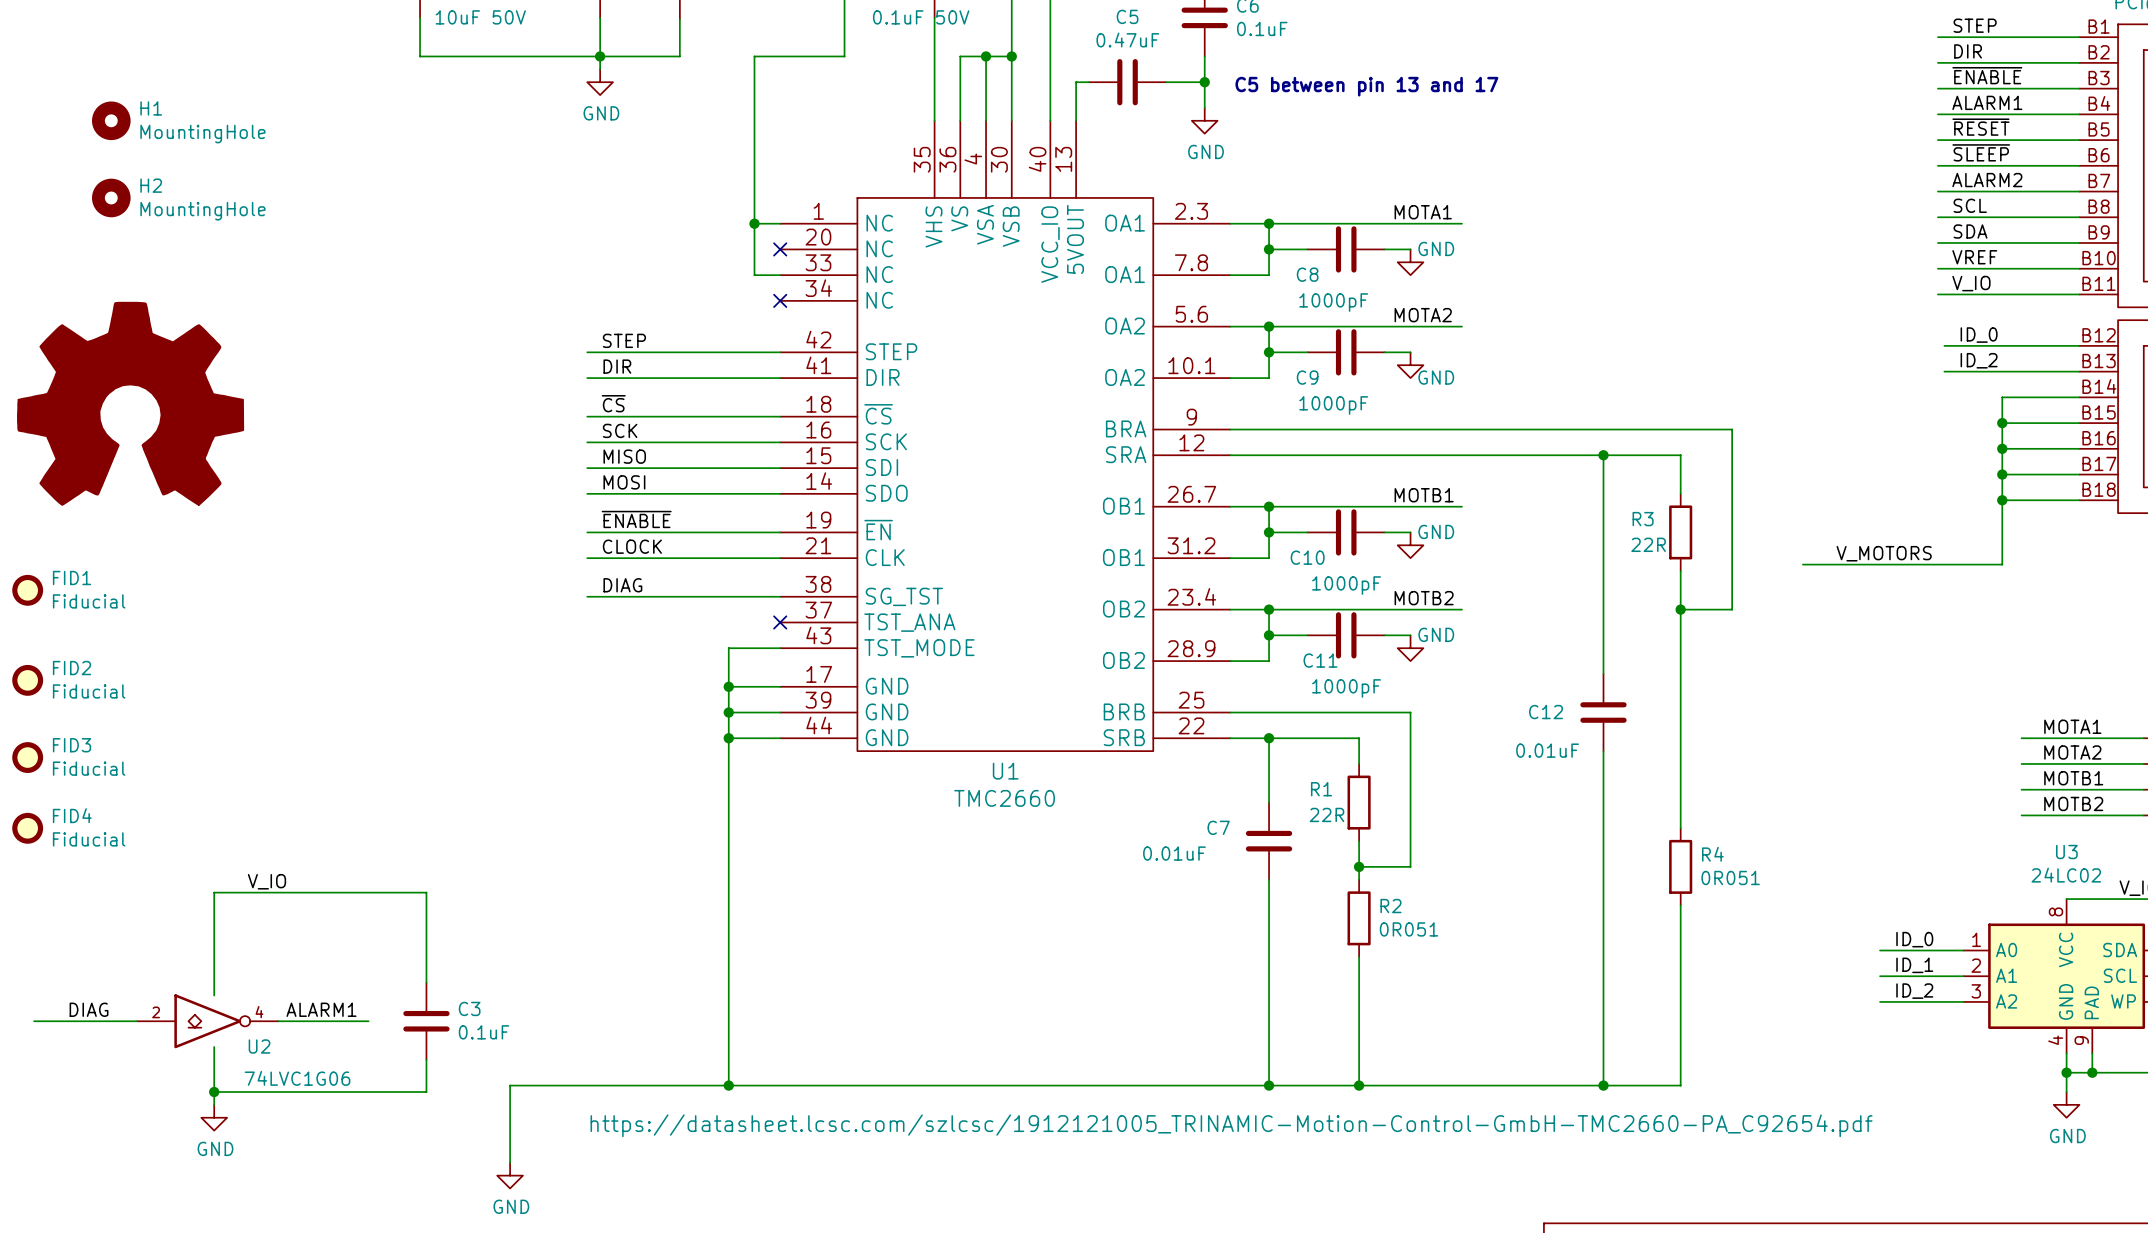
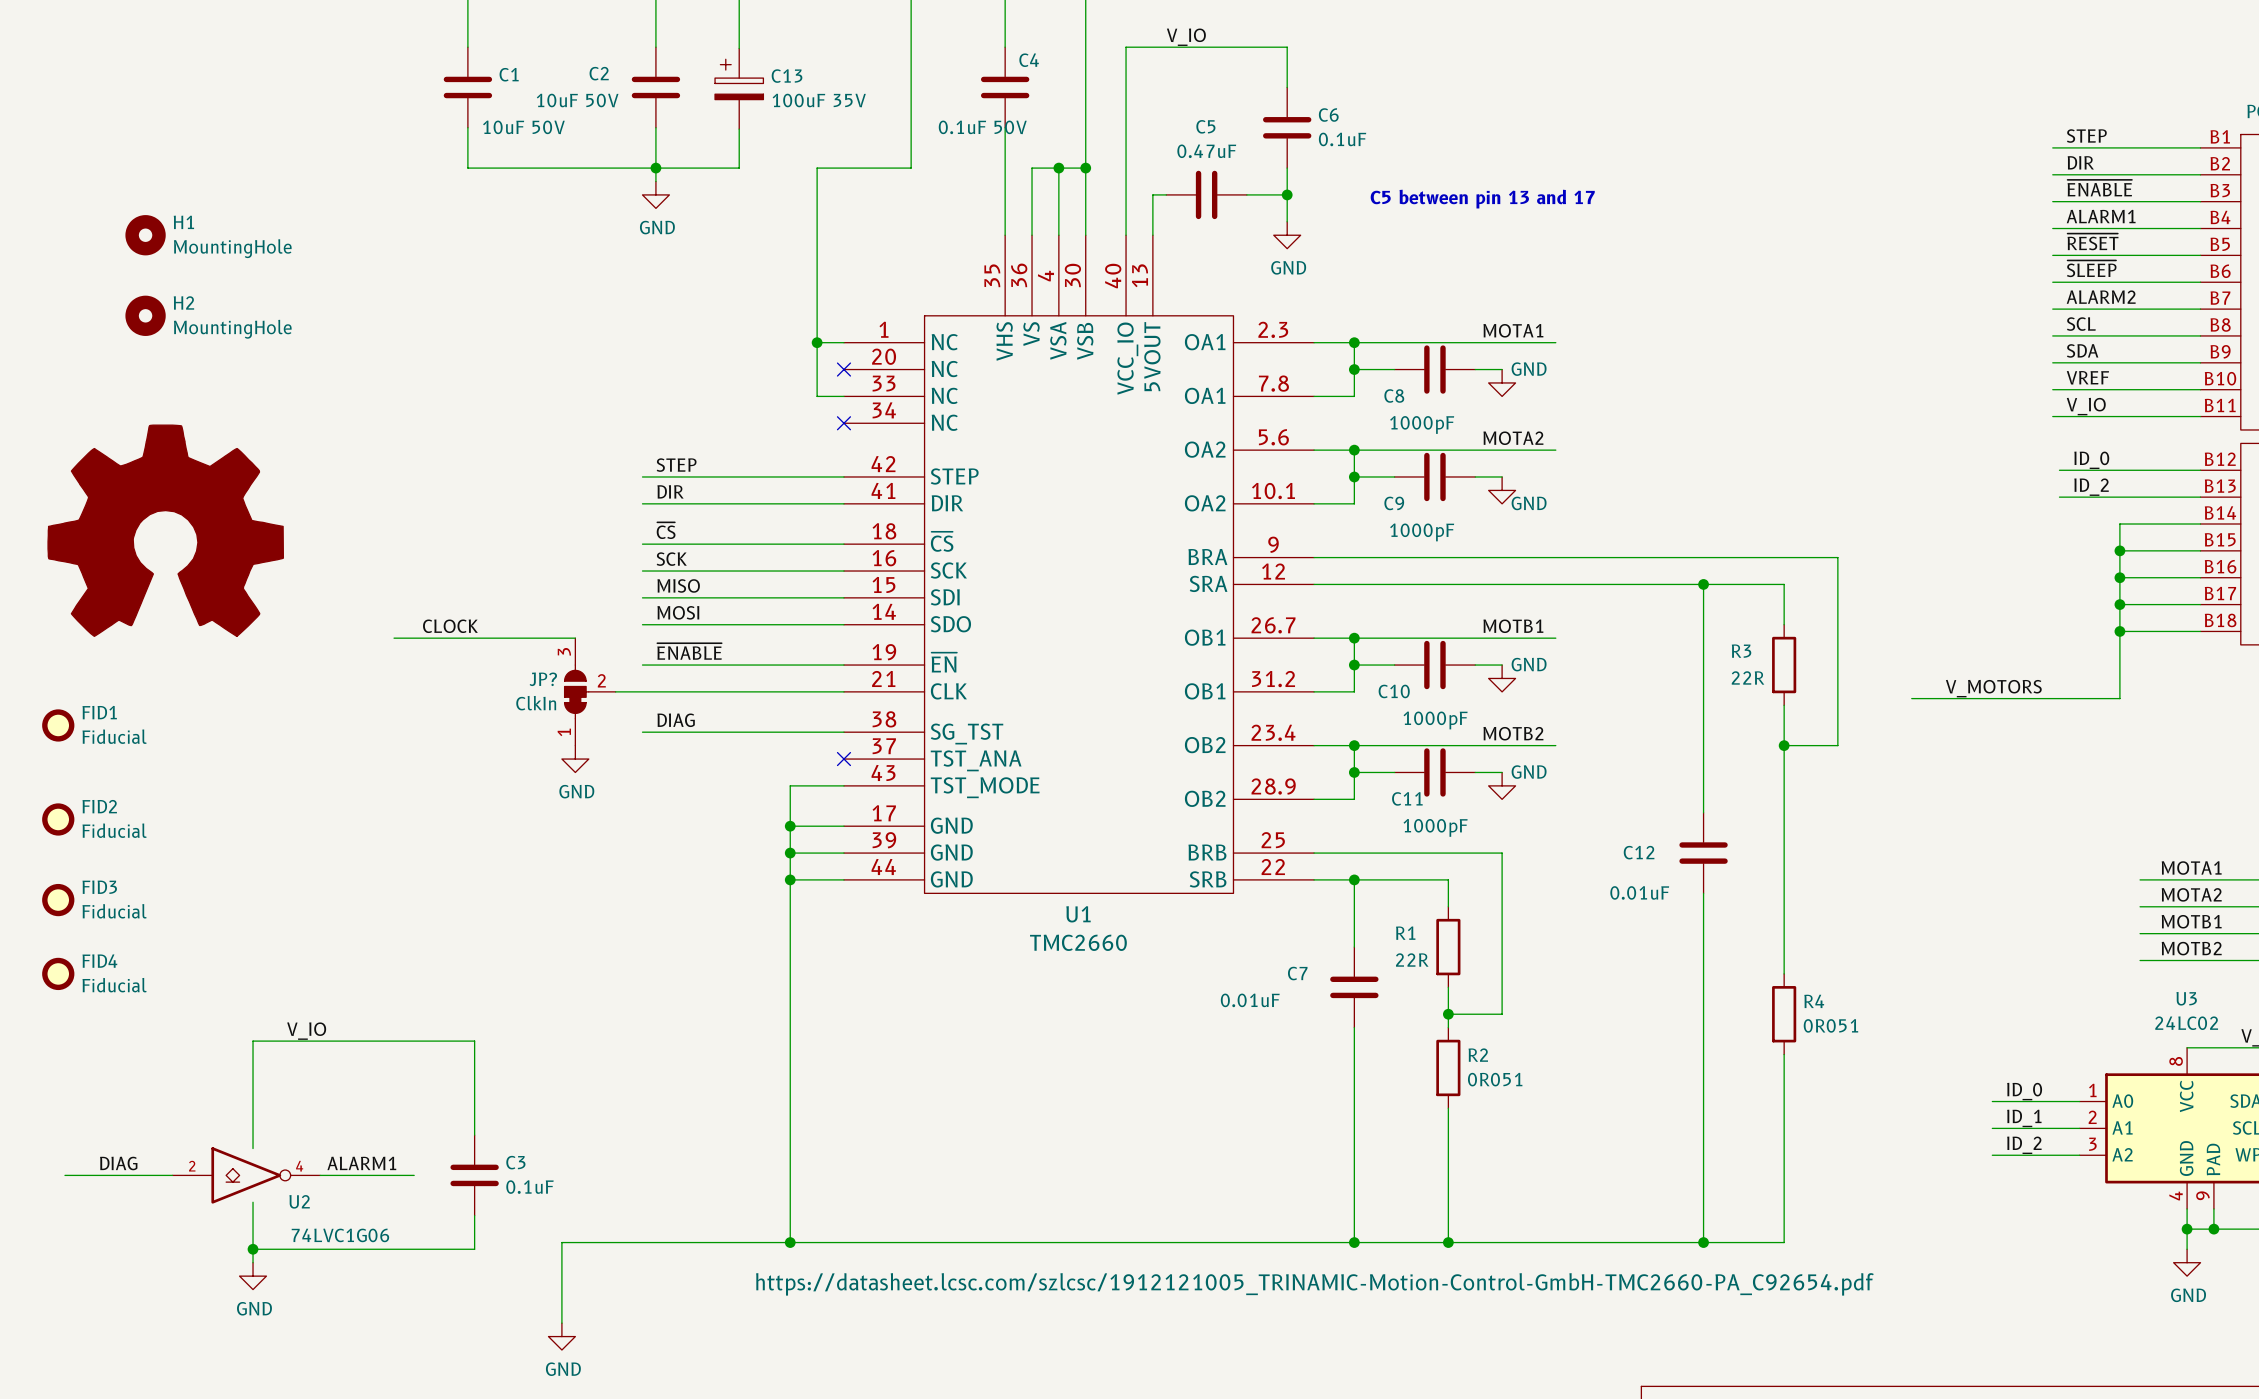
wire: none -> (394, 638) (575, 638)
label position: CLOCK (632, 546) -> CLOCK (450, 626)
JP?: none -> ClkIn (590, 691)
wire: none -> (615, 691) (642, 691)
power symbol: none -> GND (575, 759)

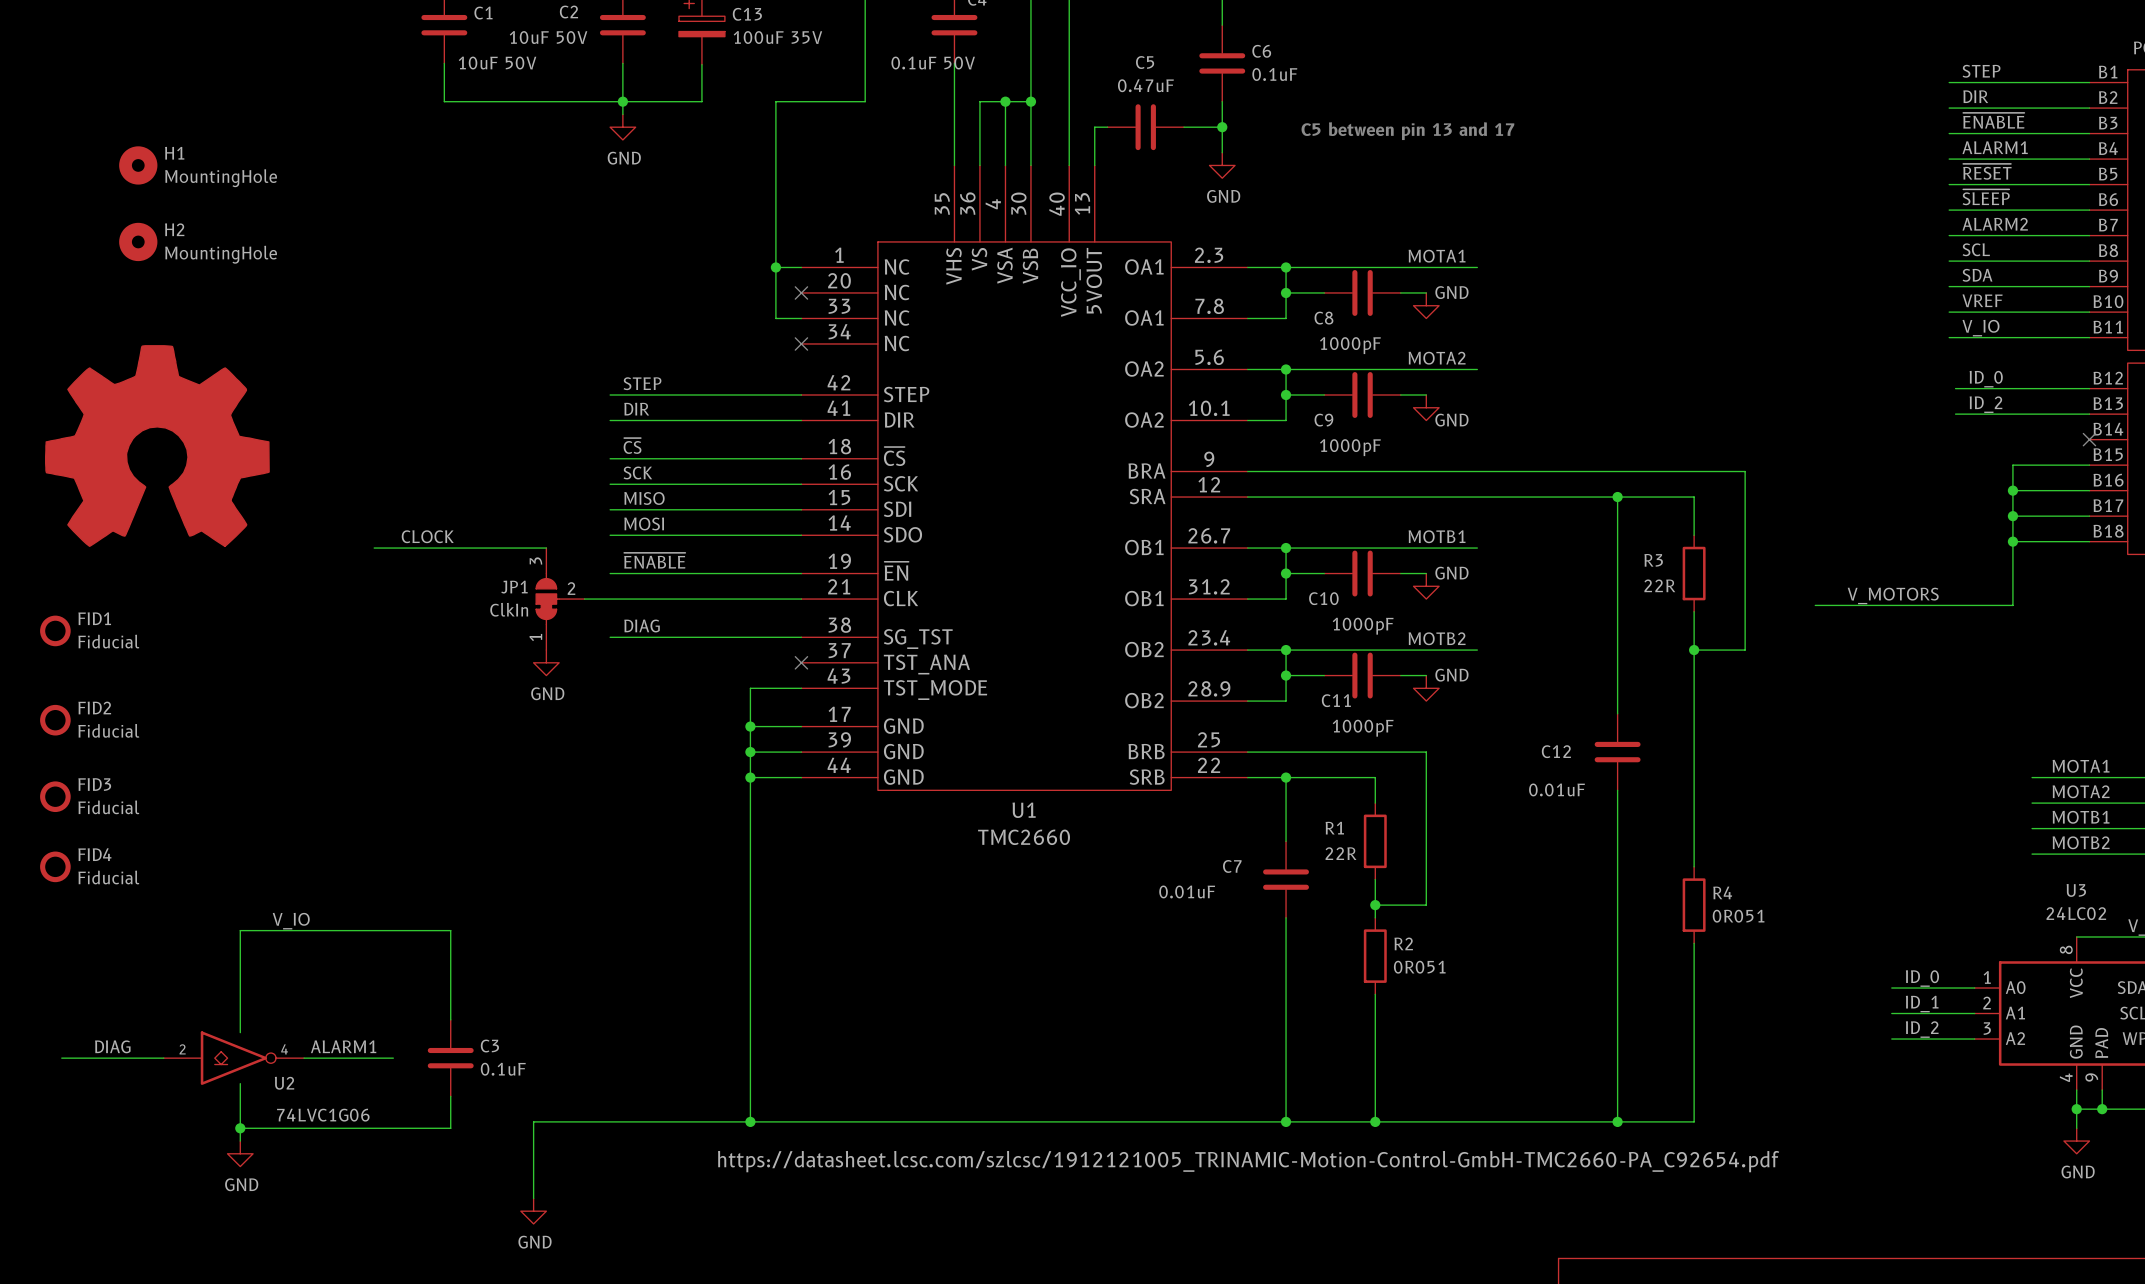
wire: (2200, 524) (2119, 524) (2119, 550) -> none
no-connect mark: none -> (2089, 439)
junction: (2119, 550) -> none
JP? name: JP? (543, 679) -> JP1 (514, 587)

